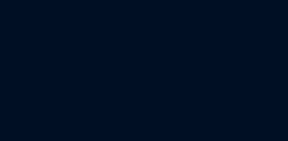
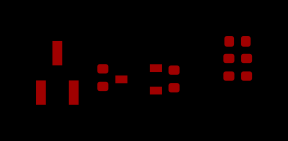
part: none -> (237, 41)
part: none -> (228, 67)
part: none -> (246, 67)
part: none -> (57, 72)
part: none -> (102, 77)
part: none -> (174, 78)
part: none -> (138, 79)

